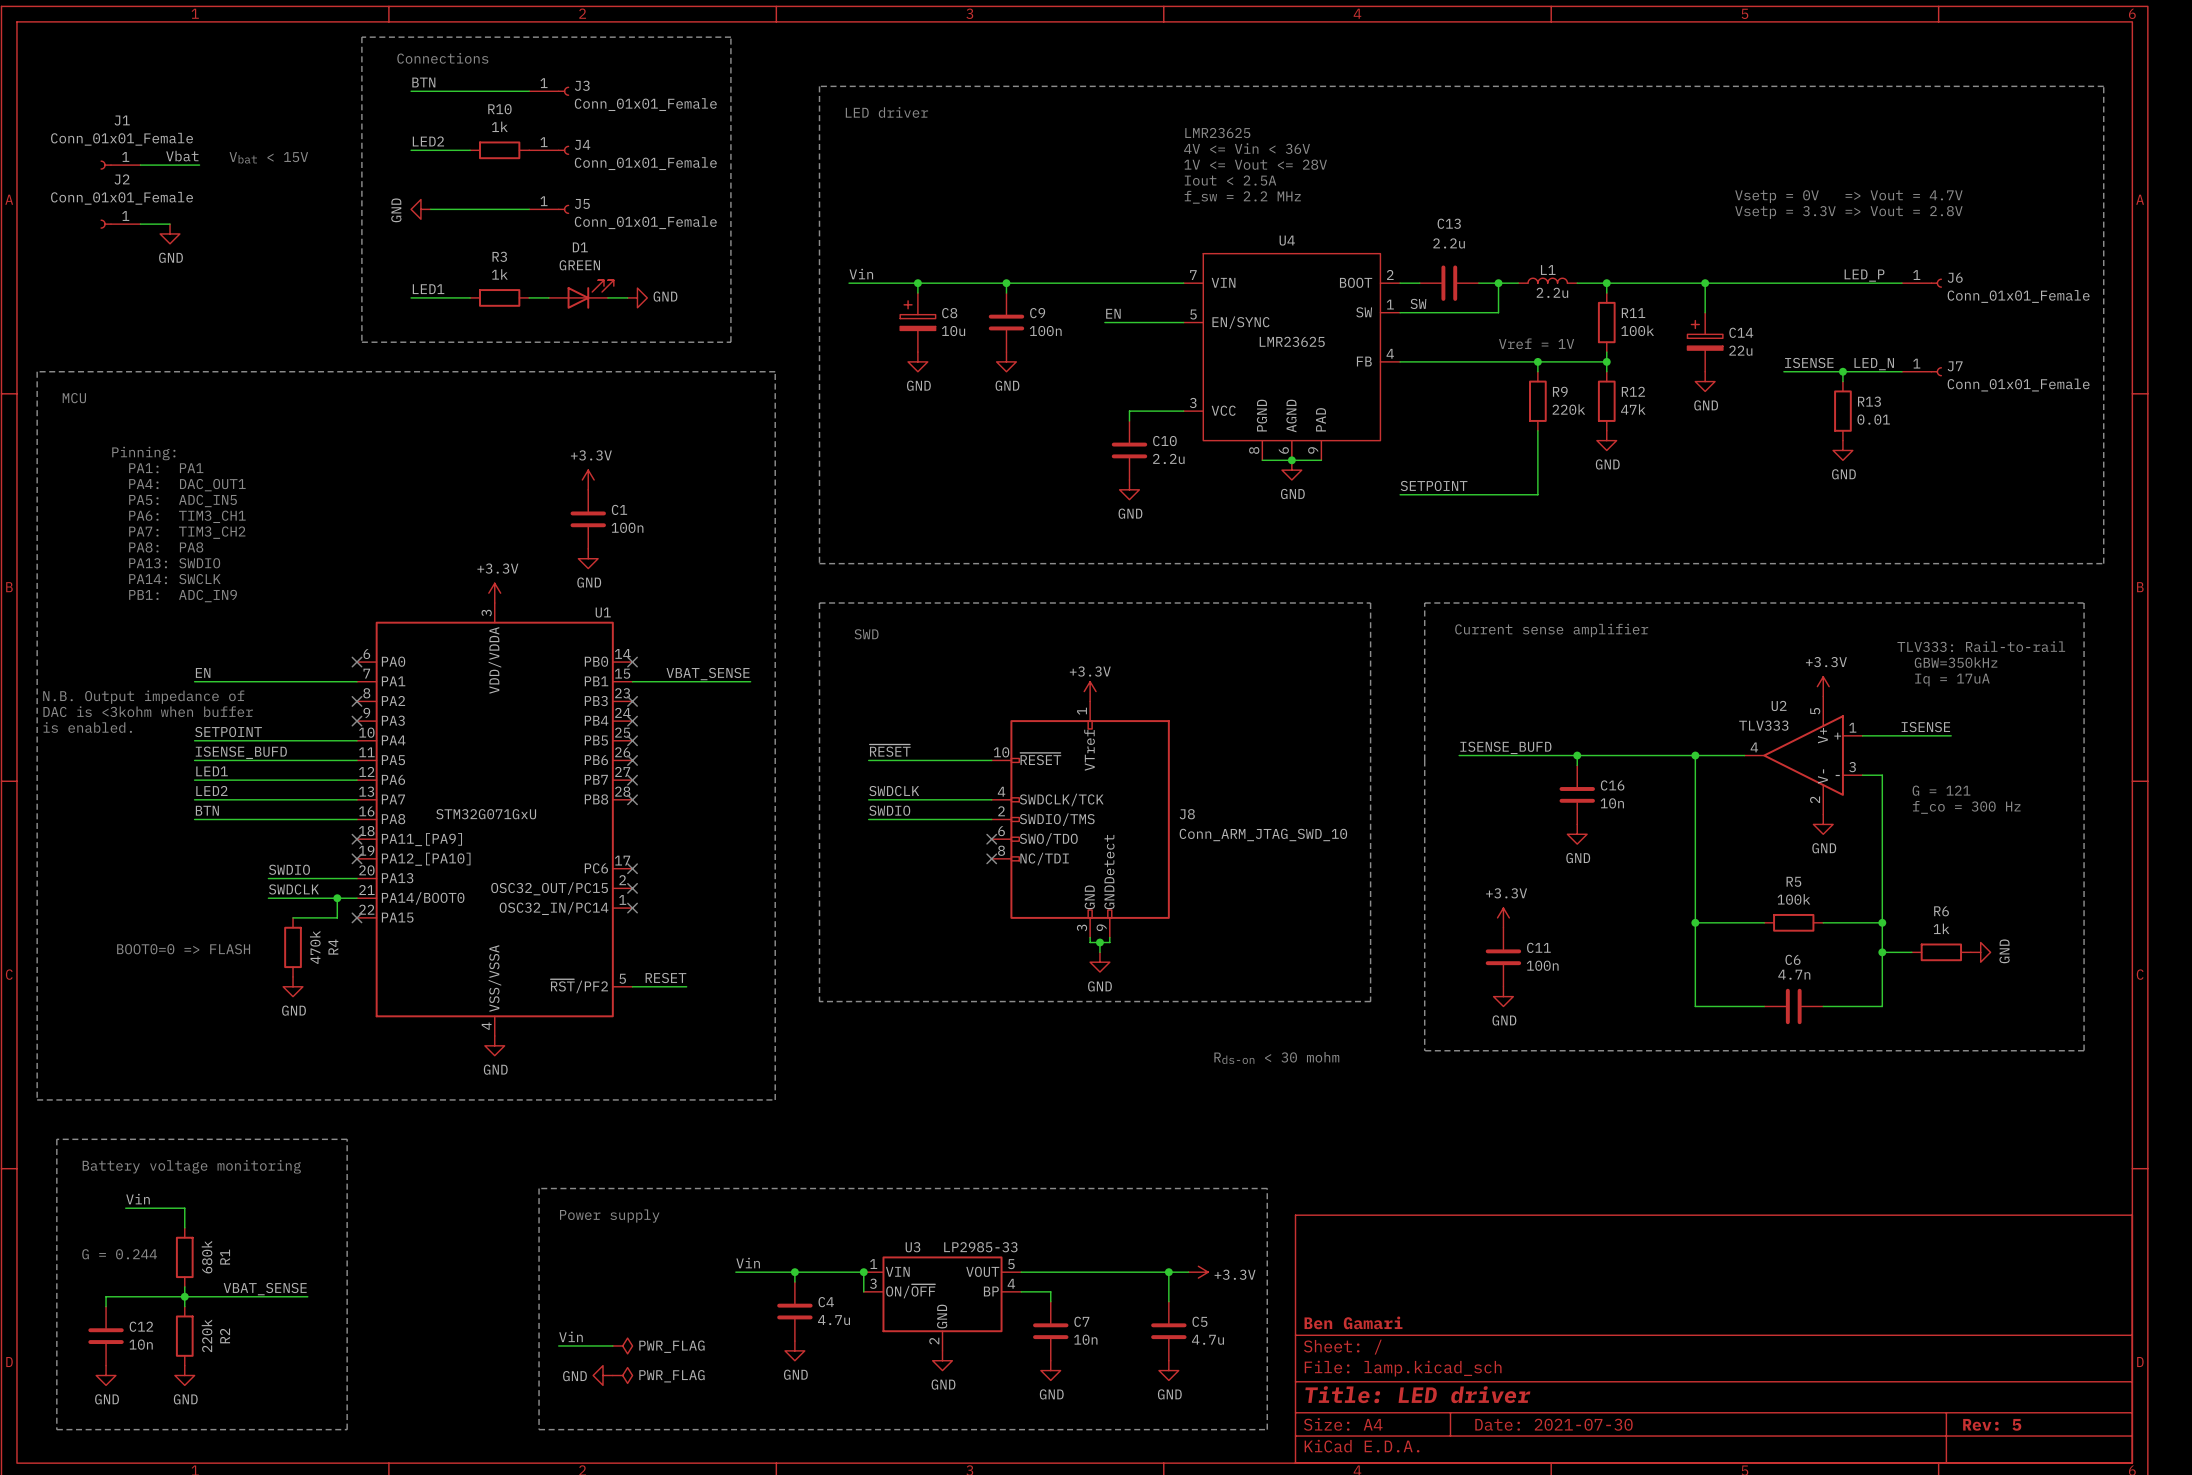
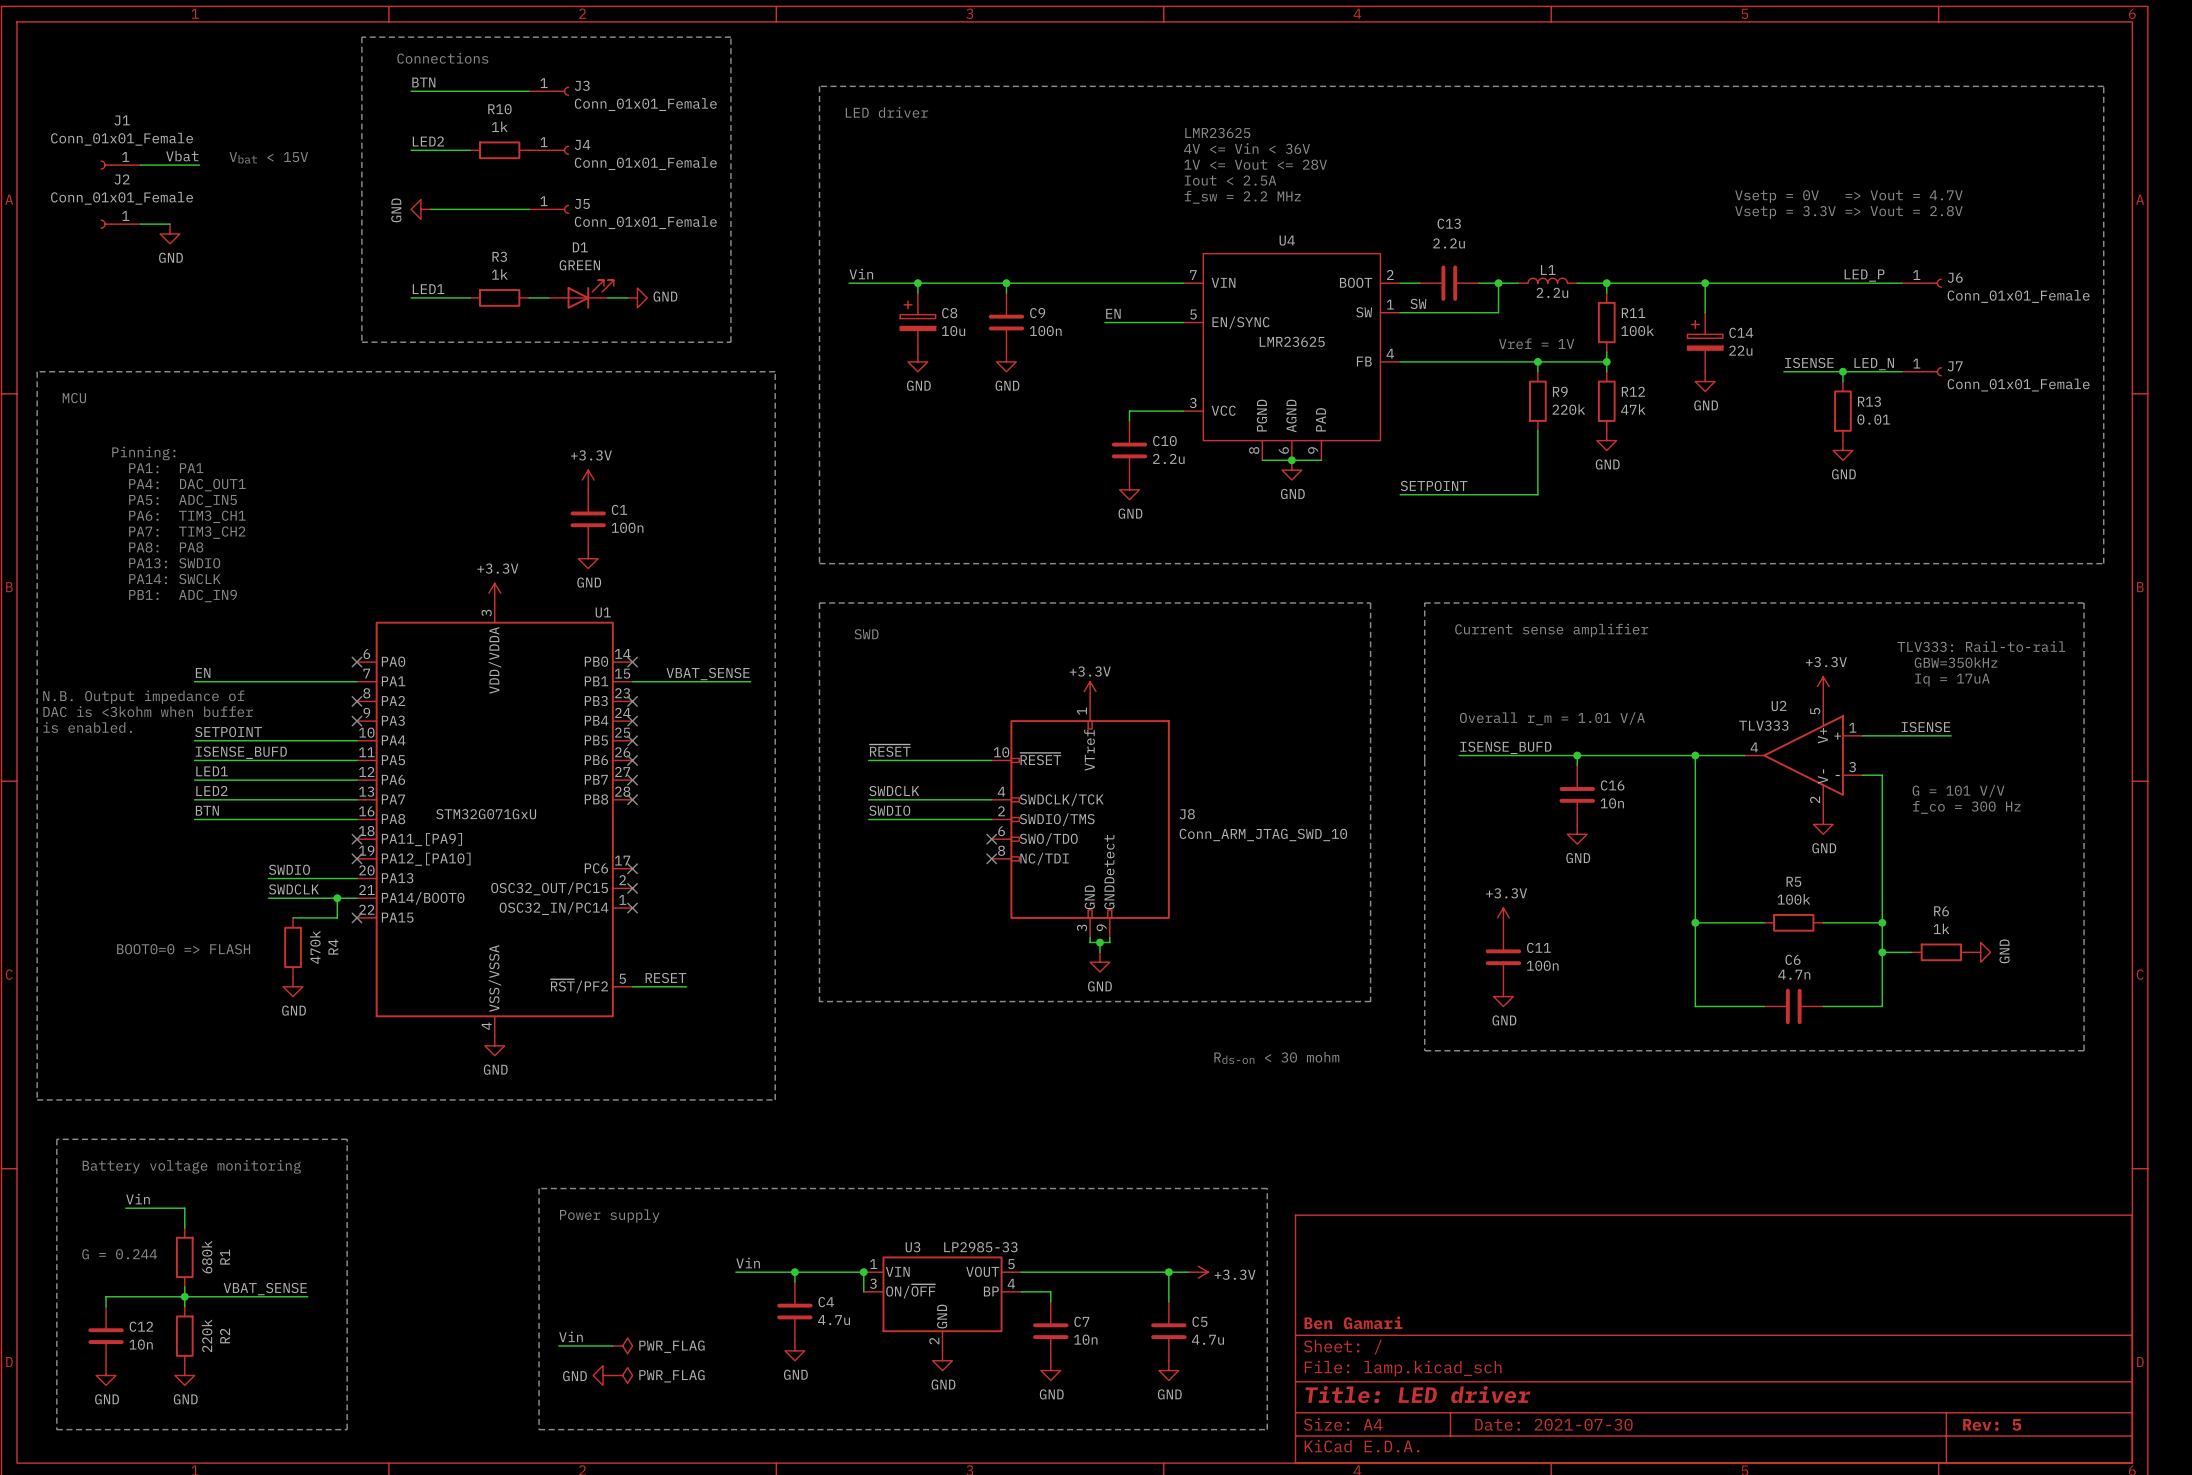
text: none -> Overall r_m = 1.01 V/A (1552, 718)
text: G = 121 (1941, 790) -> G = 101 V/V (1958, 791)

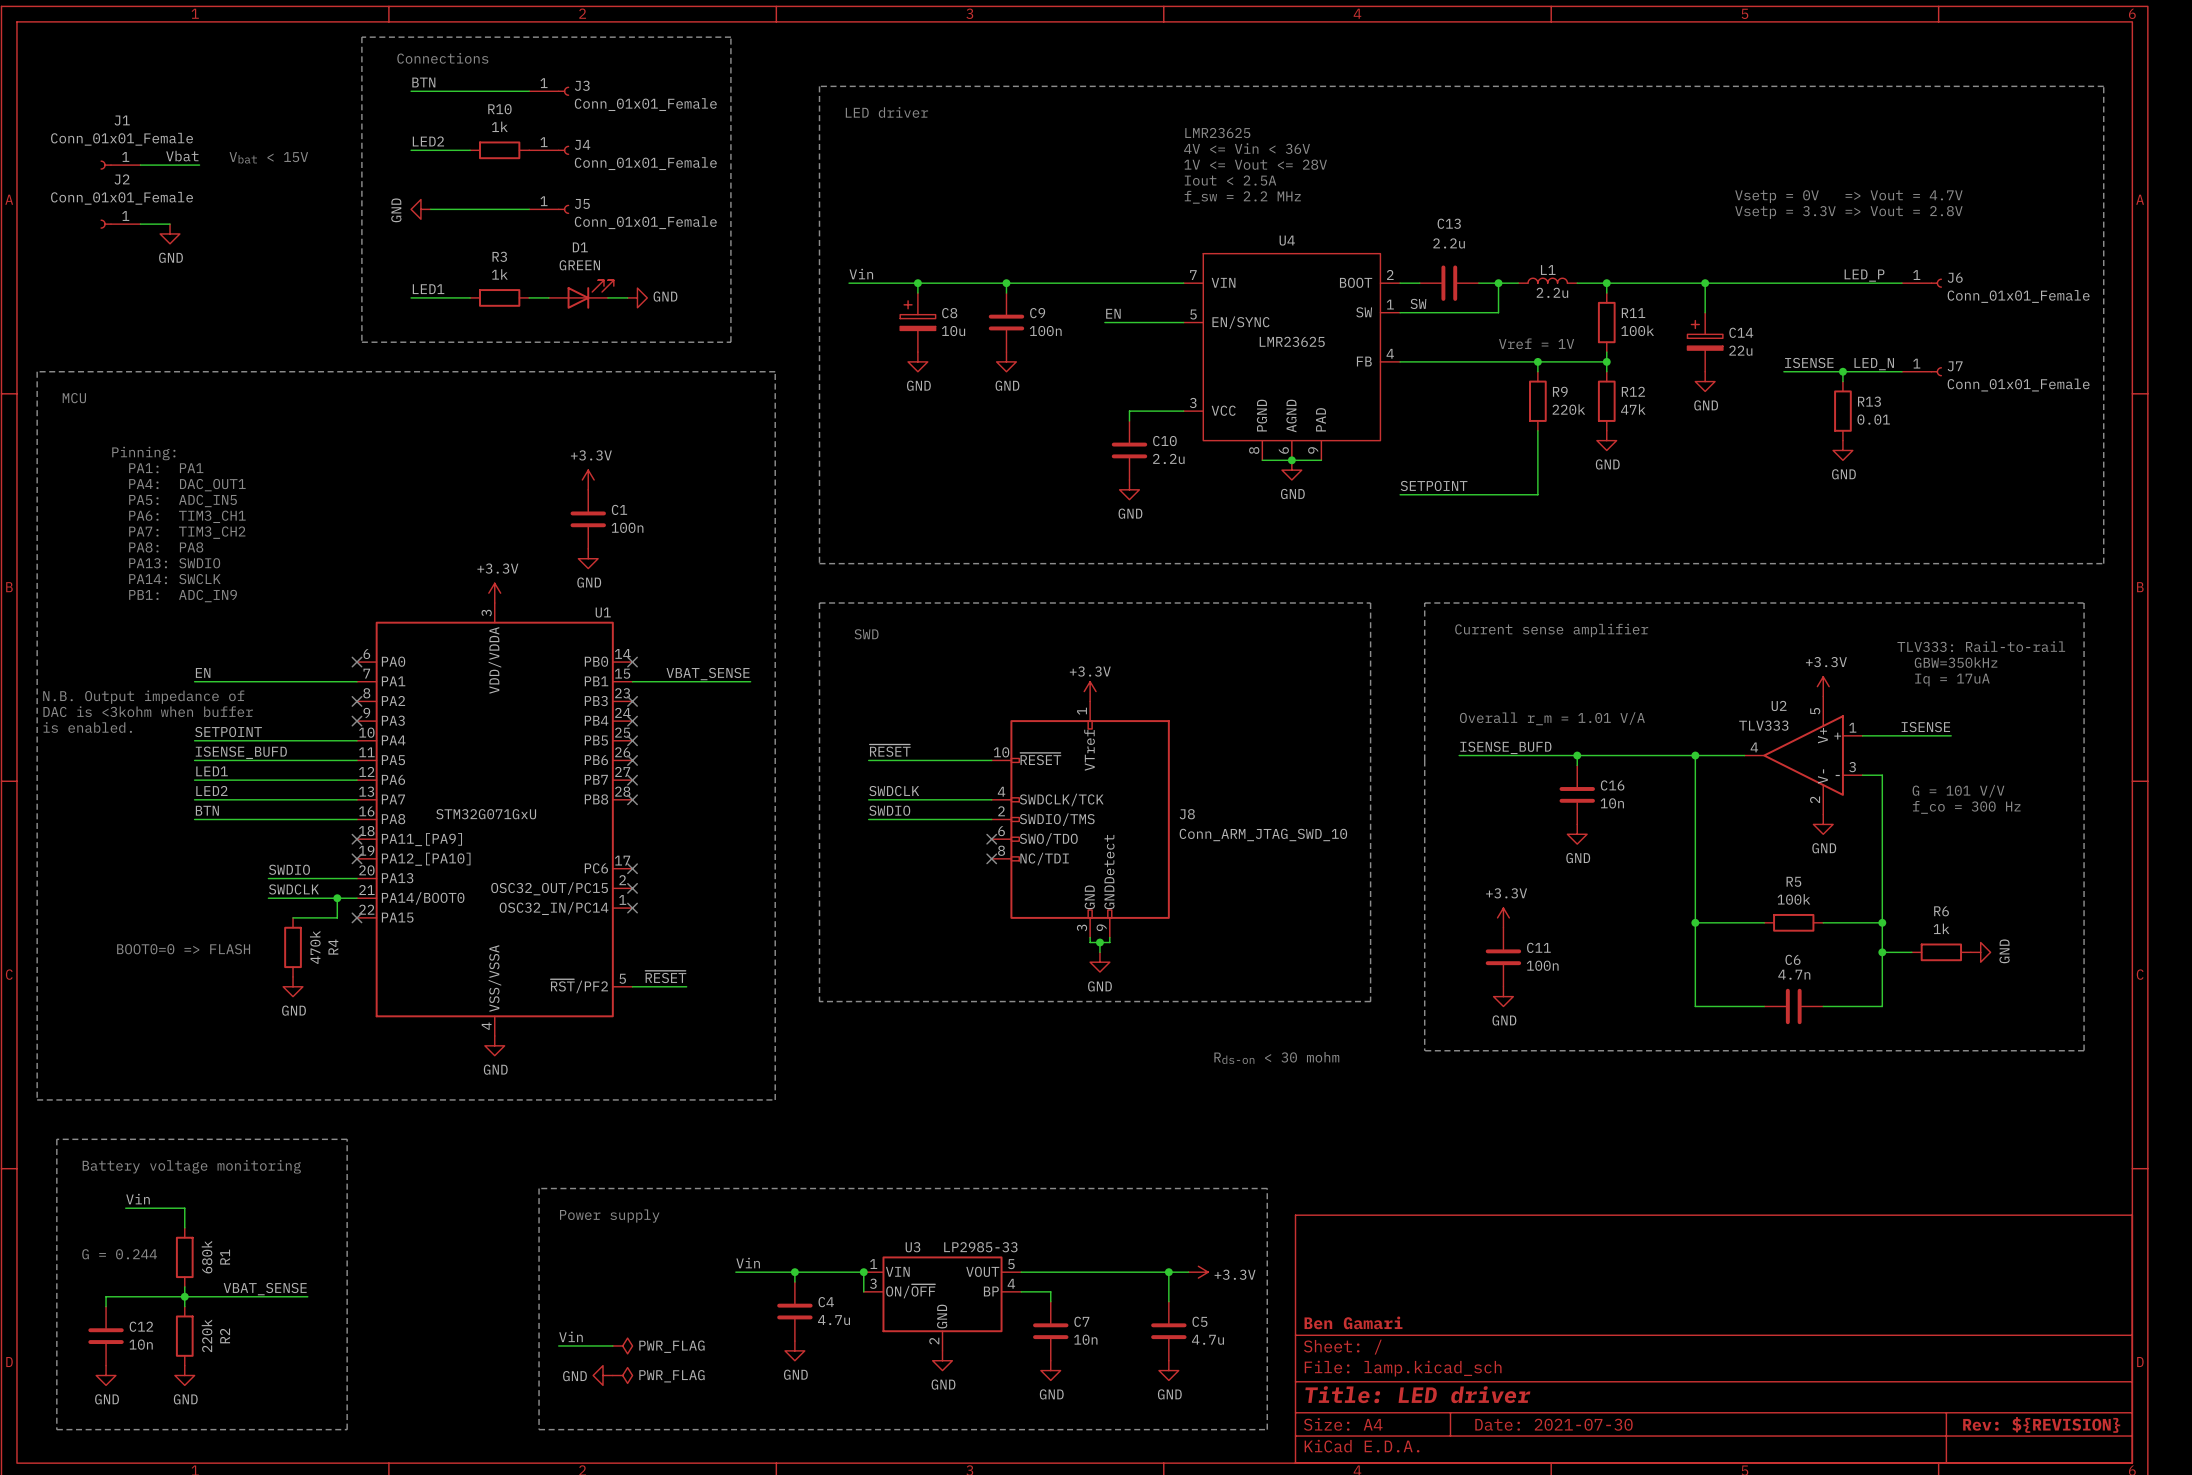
label: RESET (665, 978) -> ~{RESET} (665, 976)
title block: Rev: 5 (1992, 1424) -> Rev: ${REVISION} (2041, 1424)

